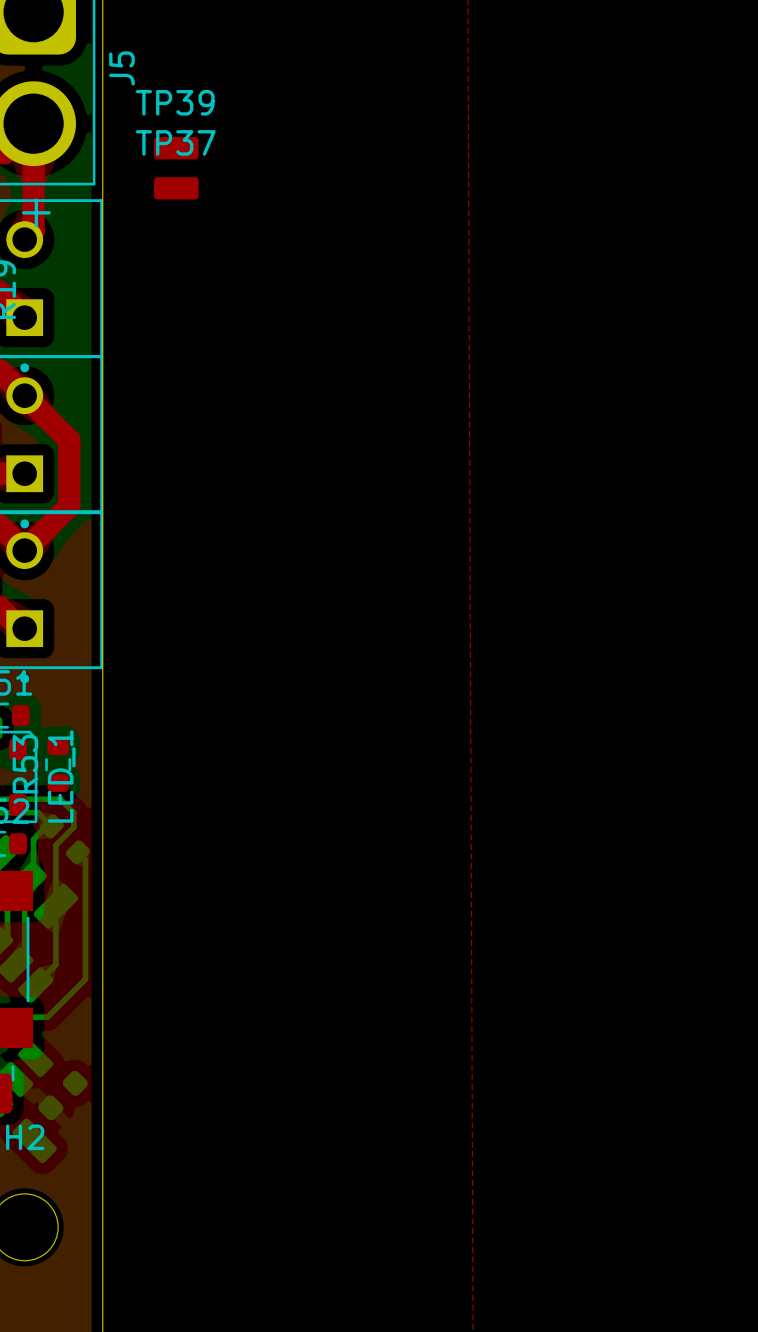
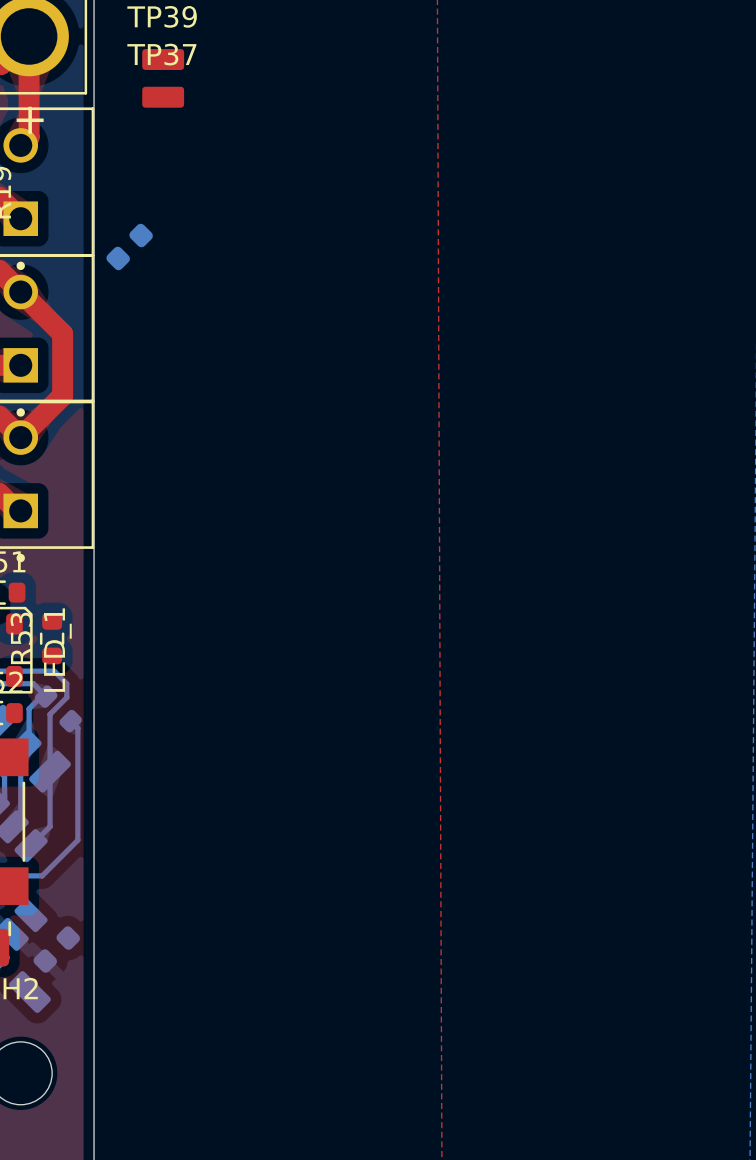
part: none -> (129, 246)

